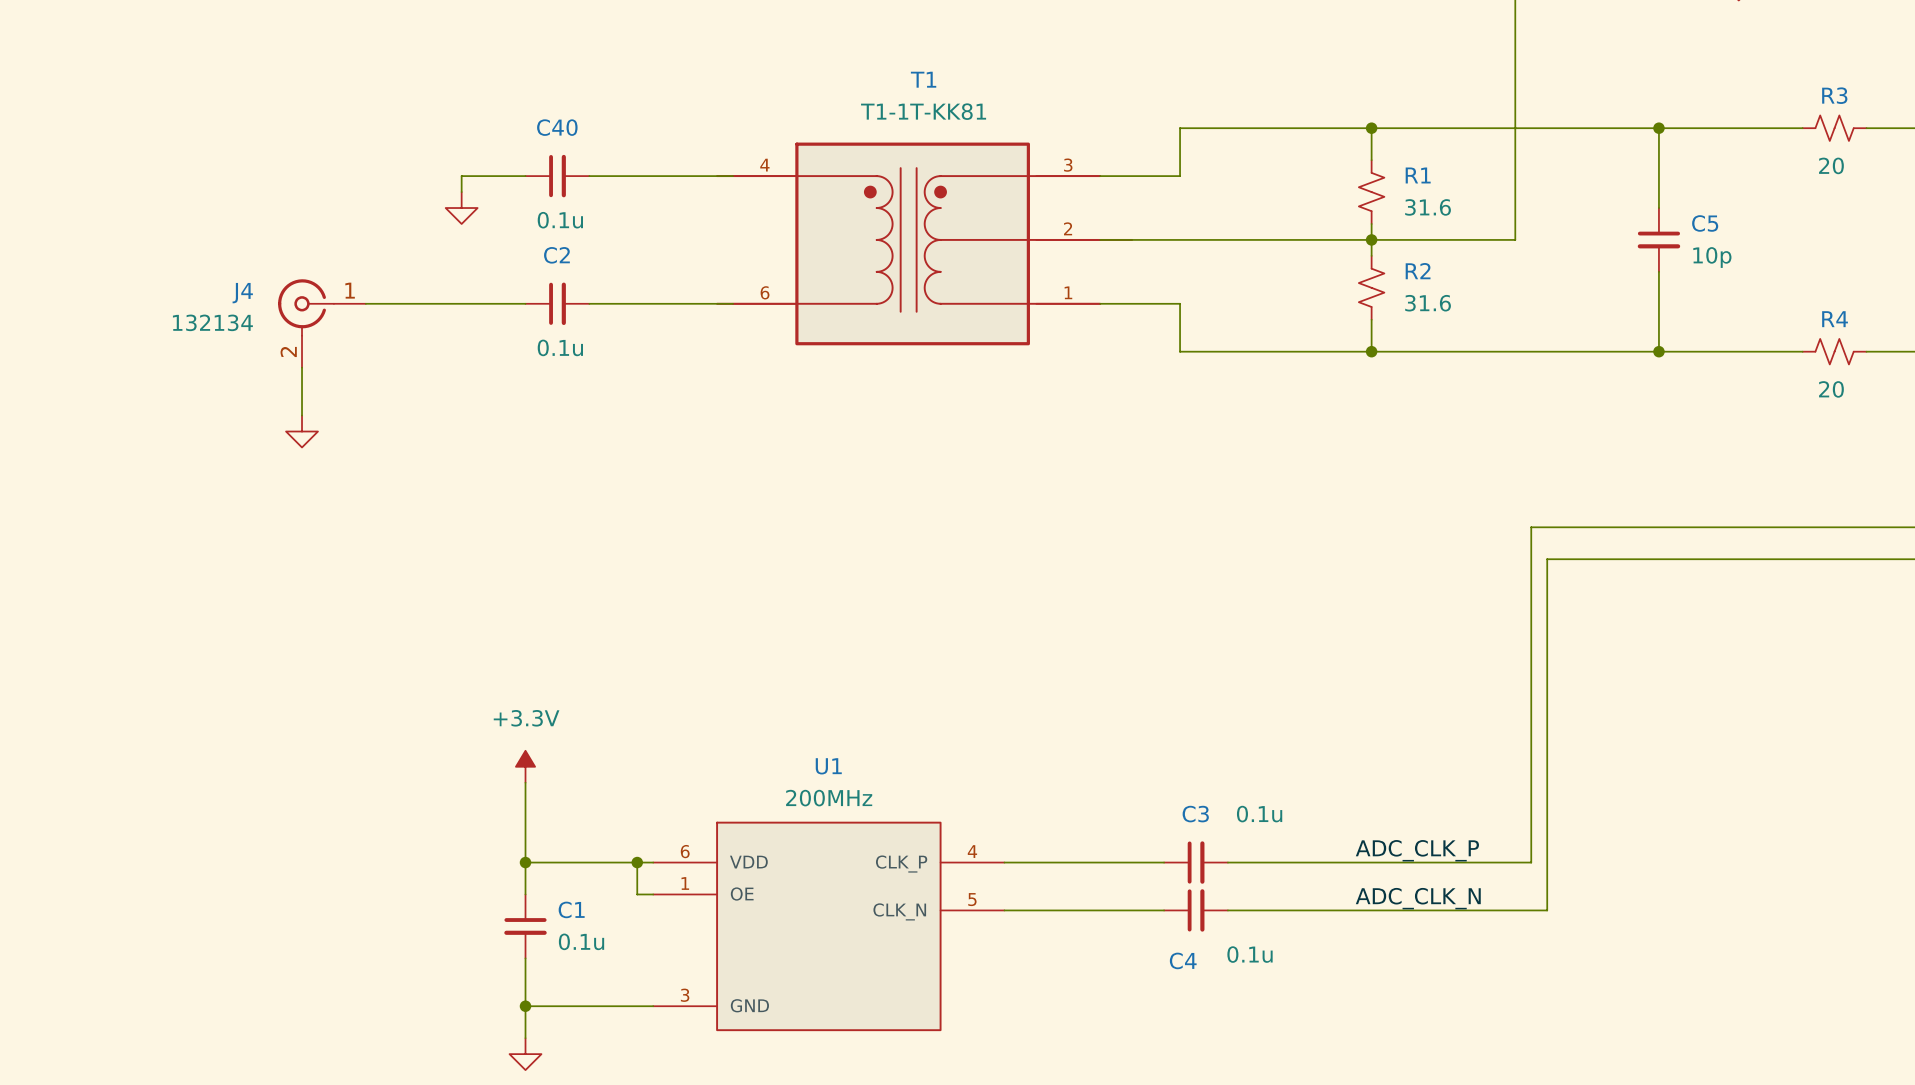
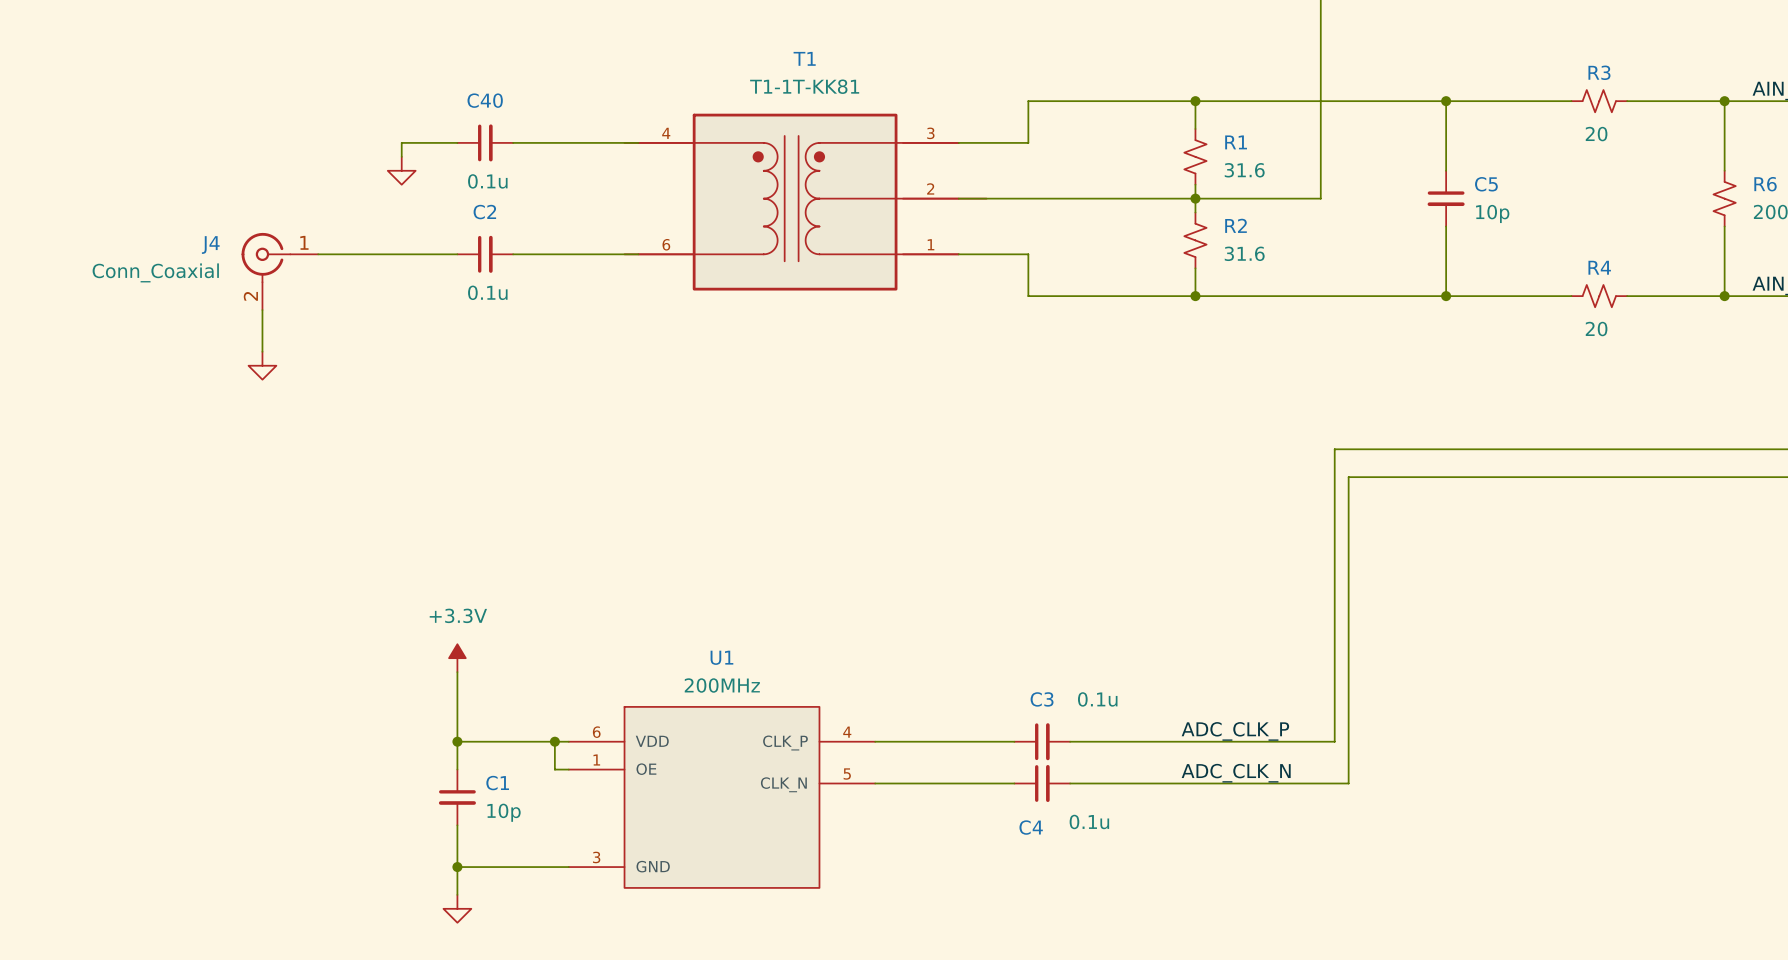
J4 value: 132134 (212, 322) -> Conn_Coaxial (155, 272)
C1 value: 0.1u (581, 941) -> 10p (504, 812)

